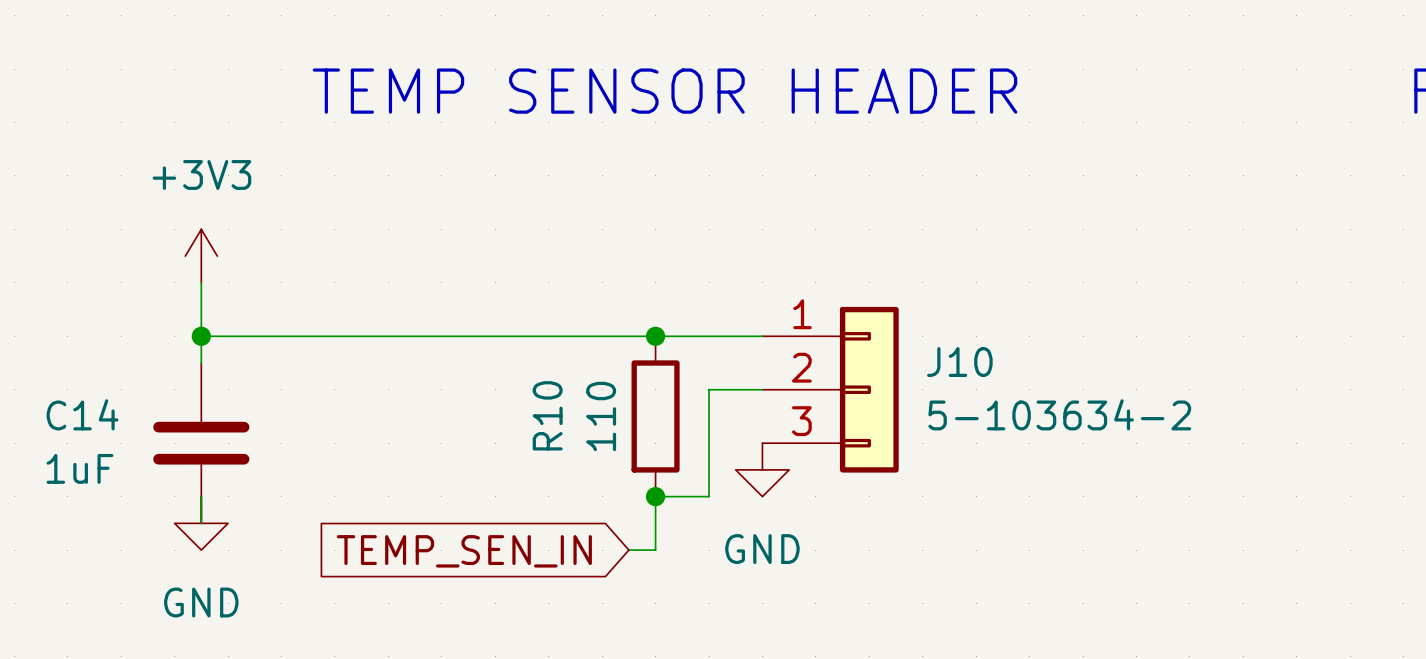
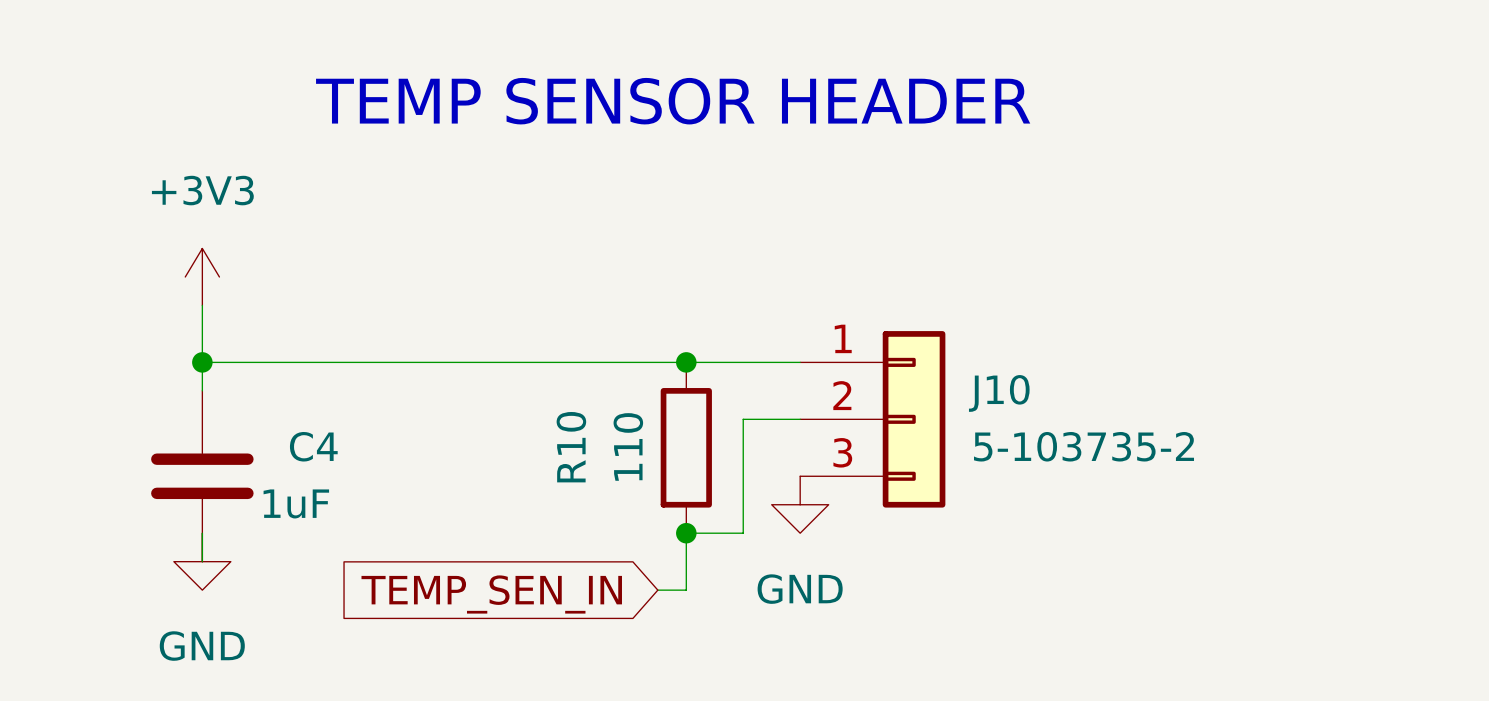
C14 name: C14 (82, 414) -> C4 (313, 446)
J10 value: 5-103634-2 (1059, 414) -> 5-103735-2 (1084, 446)
C14 value position: 1uF (80, 468) -> 1uF (296, 503)

